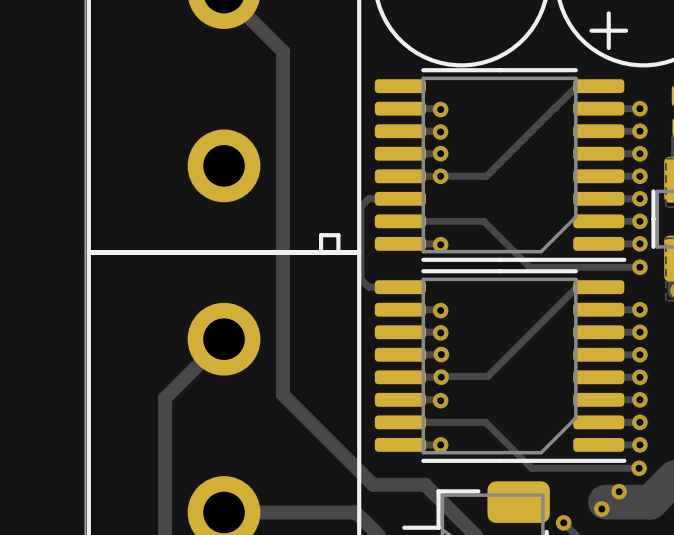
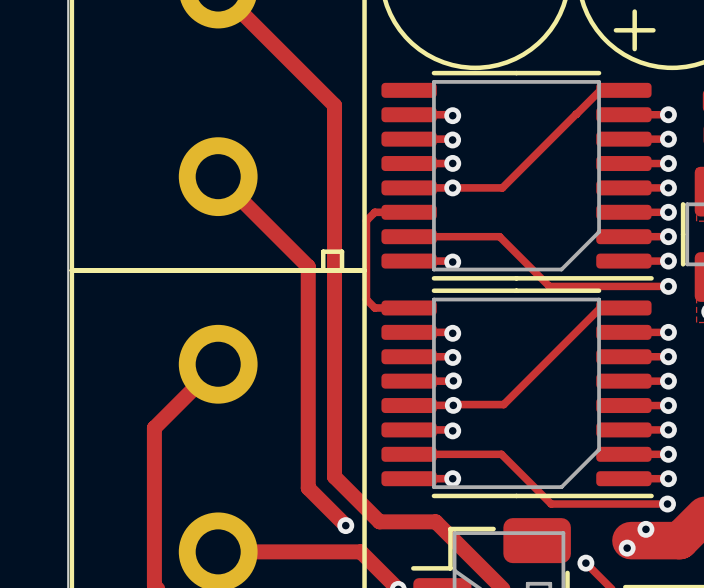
track: (282, 51) (282, 394) (331, 443) -> (281, 52) (334, 105) (334, 476)
track: none -> (218, 176) (308, 266) (308, 488) (345, 525)
via: none -> (345, 525)

